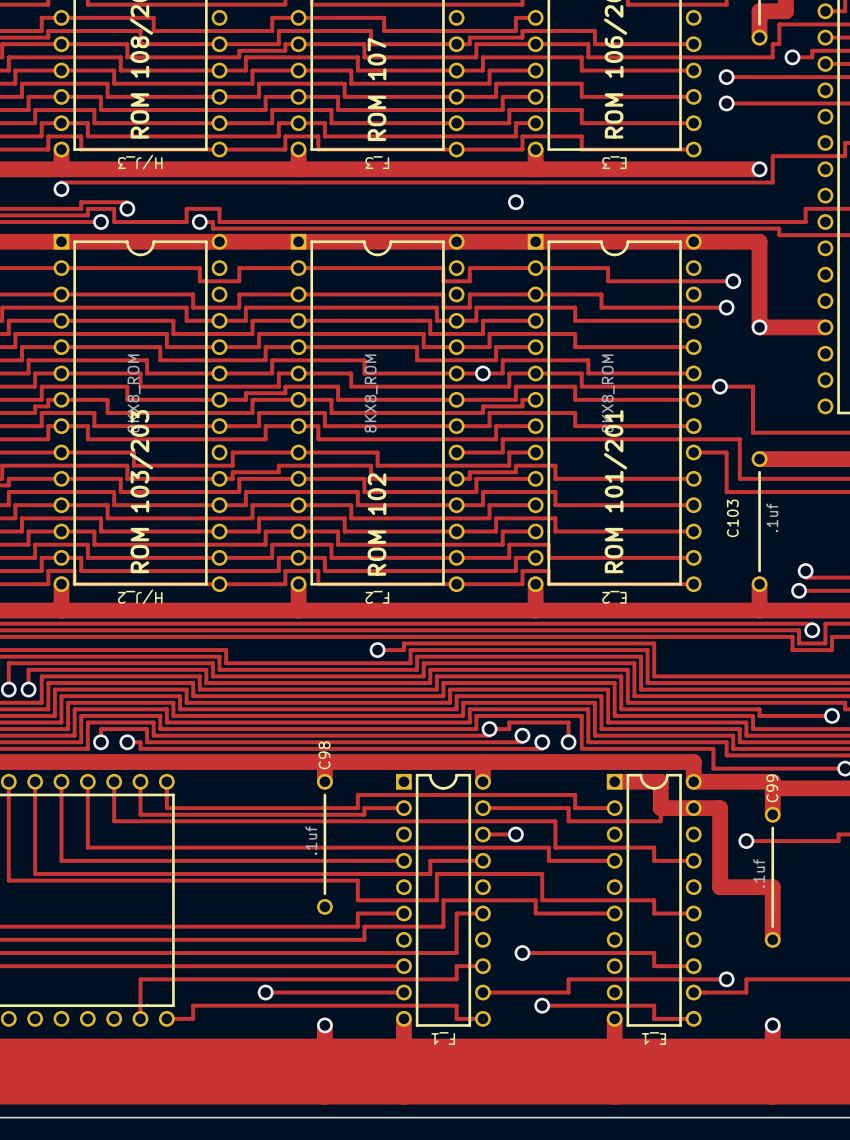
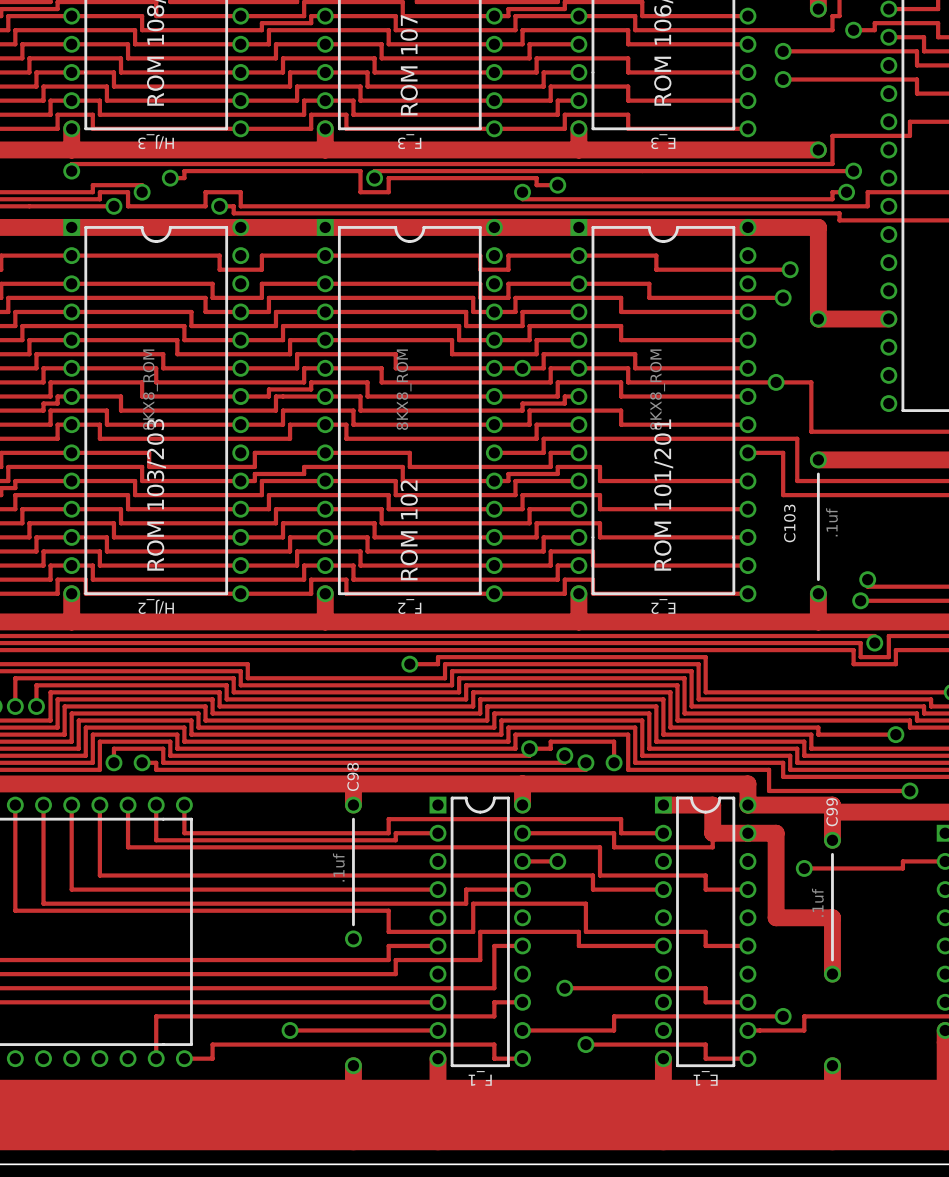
track: none -> (853, 171) (374, 171) (374, 178)
via: none -> (853, 171)
track: none -> (170, 178) (184, 178) (184, 171) (360, 171) (360, 192) (388, 192) (388, 178) (536, 178) (536, 185) (557, 185)
via: none -> (170, 178)
via: none -> (374, 178)
track: none -> (522, 192) (522, 199) (832, 199) (832, 192) (846, 192)
via: none -> (522, 192)
via: none -> (846, 192)

